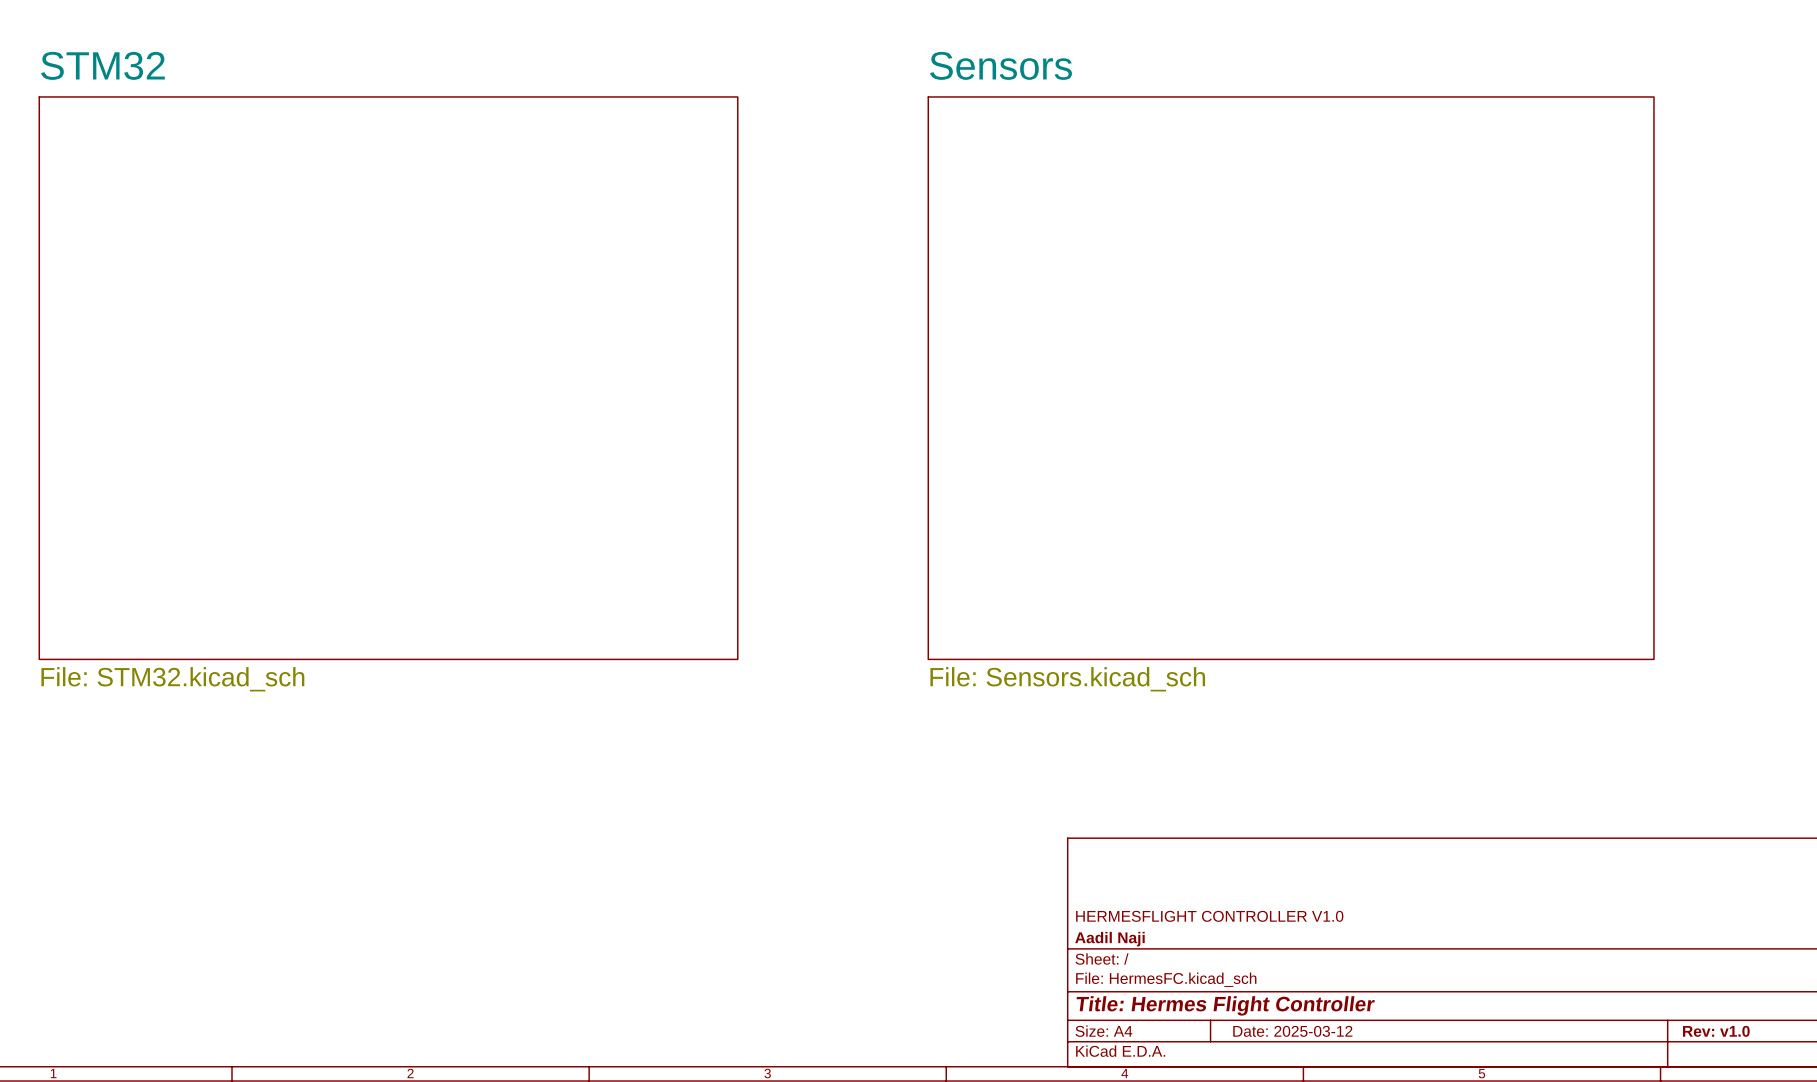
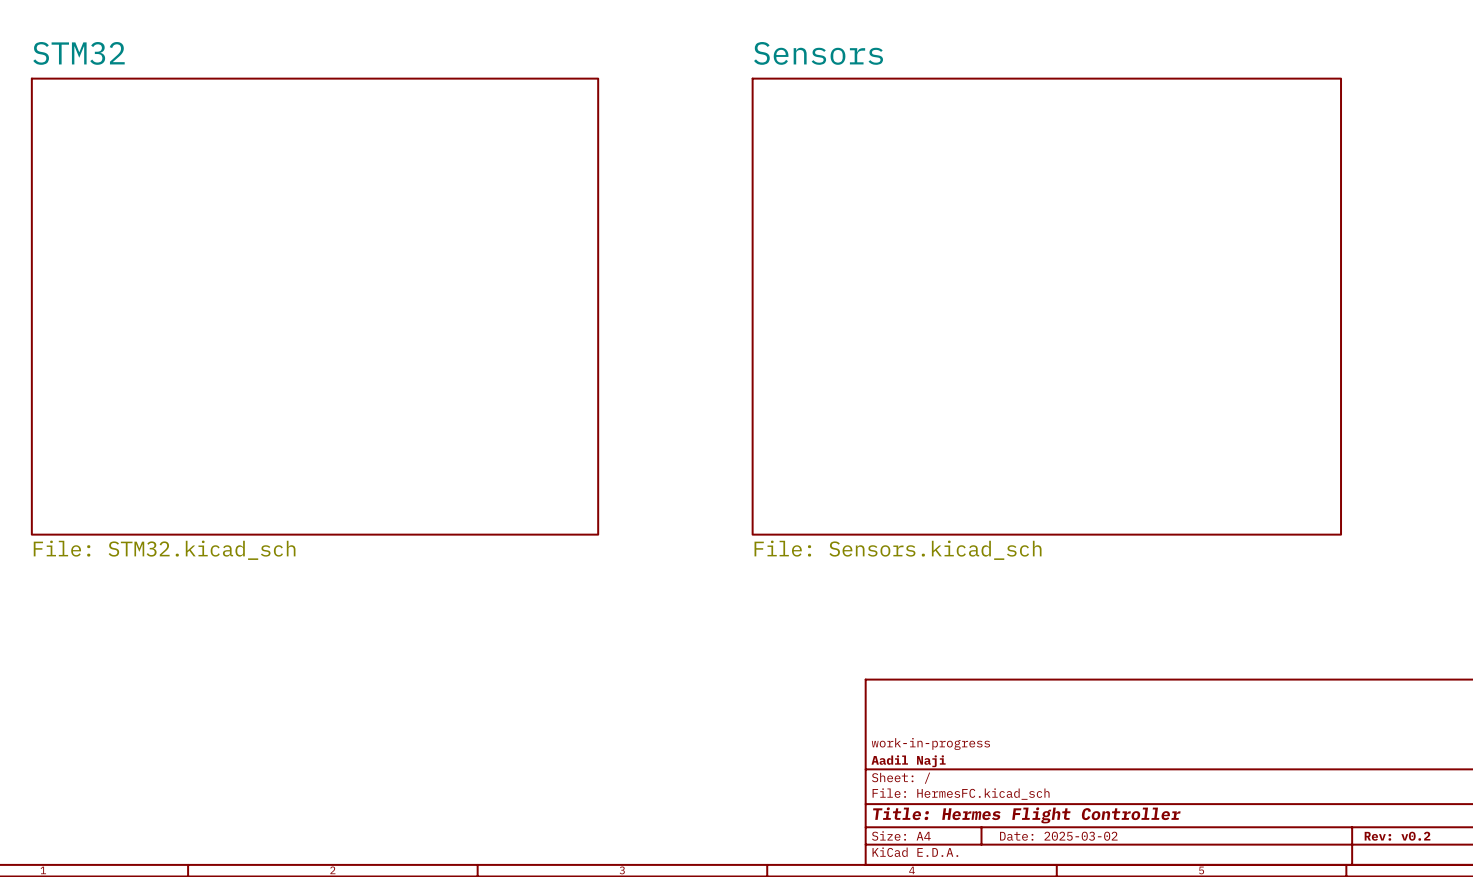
title block: HERMESFLIGHT CONTROLLER V1.0 (1209, 916) -> work-in-progress (930, 743)
title block: Date: 2025-03-12 (1292, 1031) -> Date: 2025-03-02 (1058, 836)
title block: Rev: v1.0 (1716, 1031) -> Rev: v0.2 (1397, 836)

